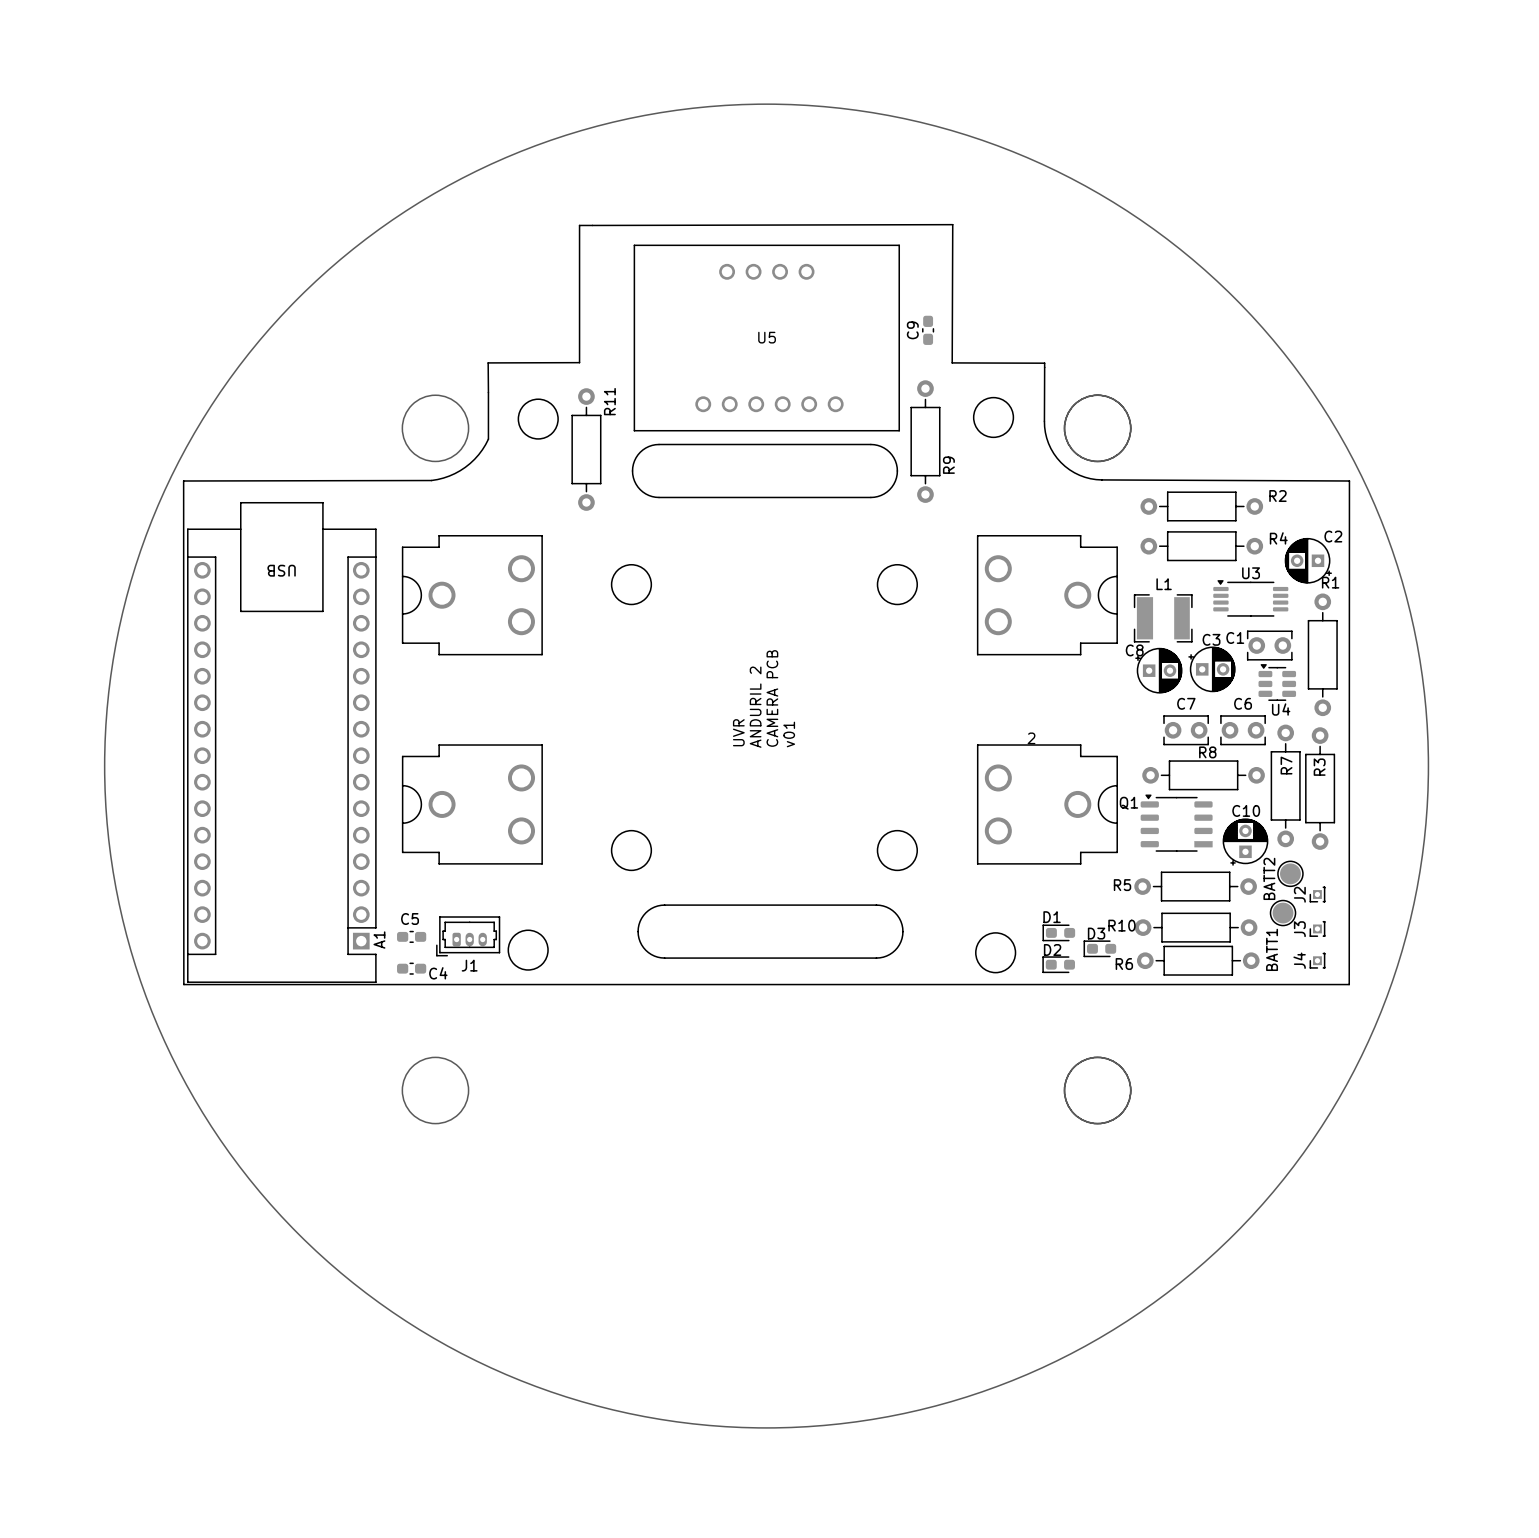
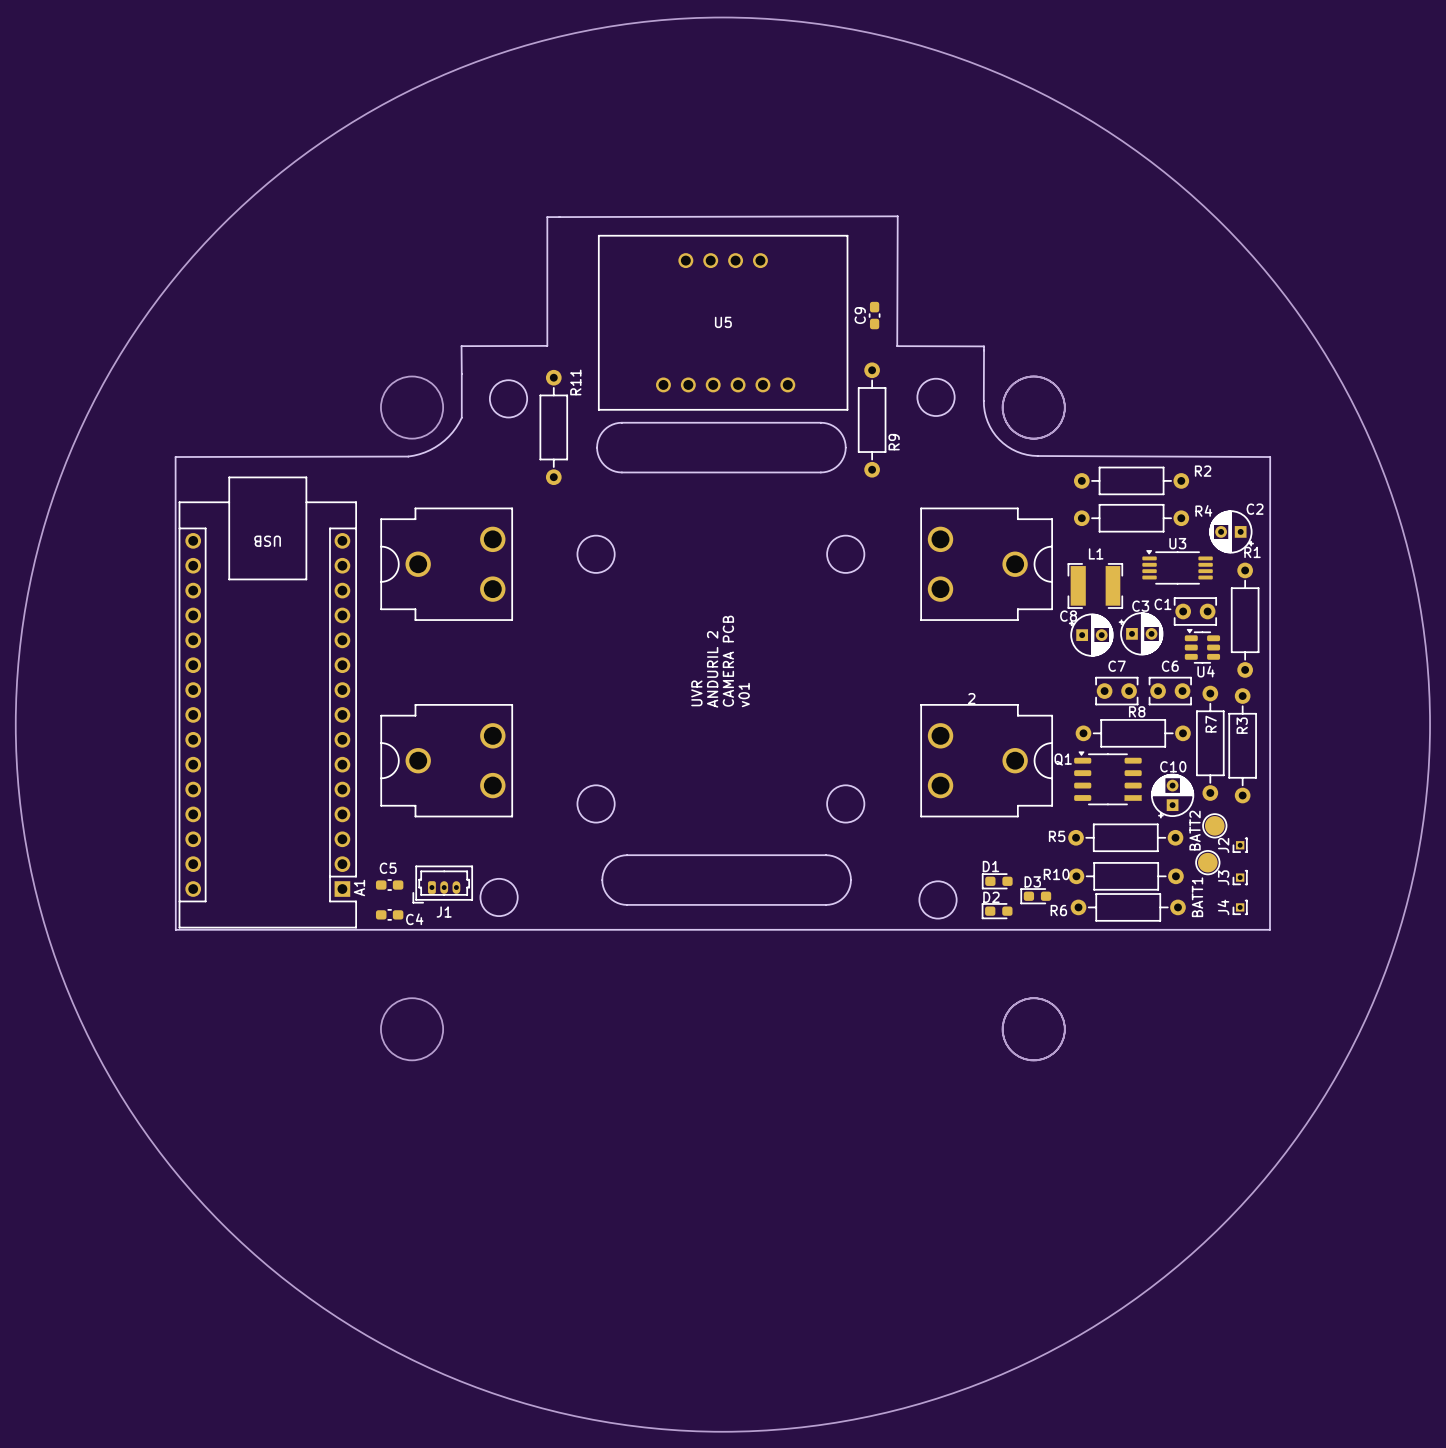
drawing shape: [104, 103, 1429, 1429] -> [15, 17, 1431, 1433]

